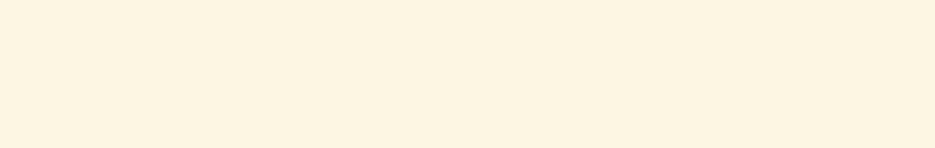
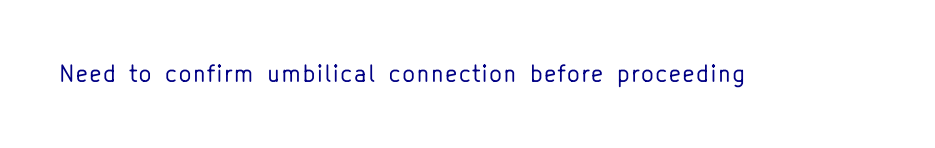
text: none -> Need to confirm umbilical connection before proceeding (402, 75)

